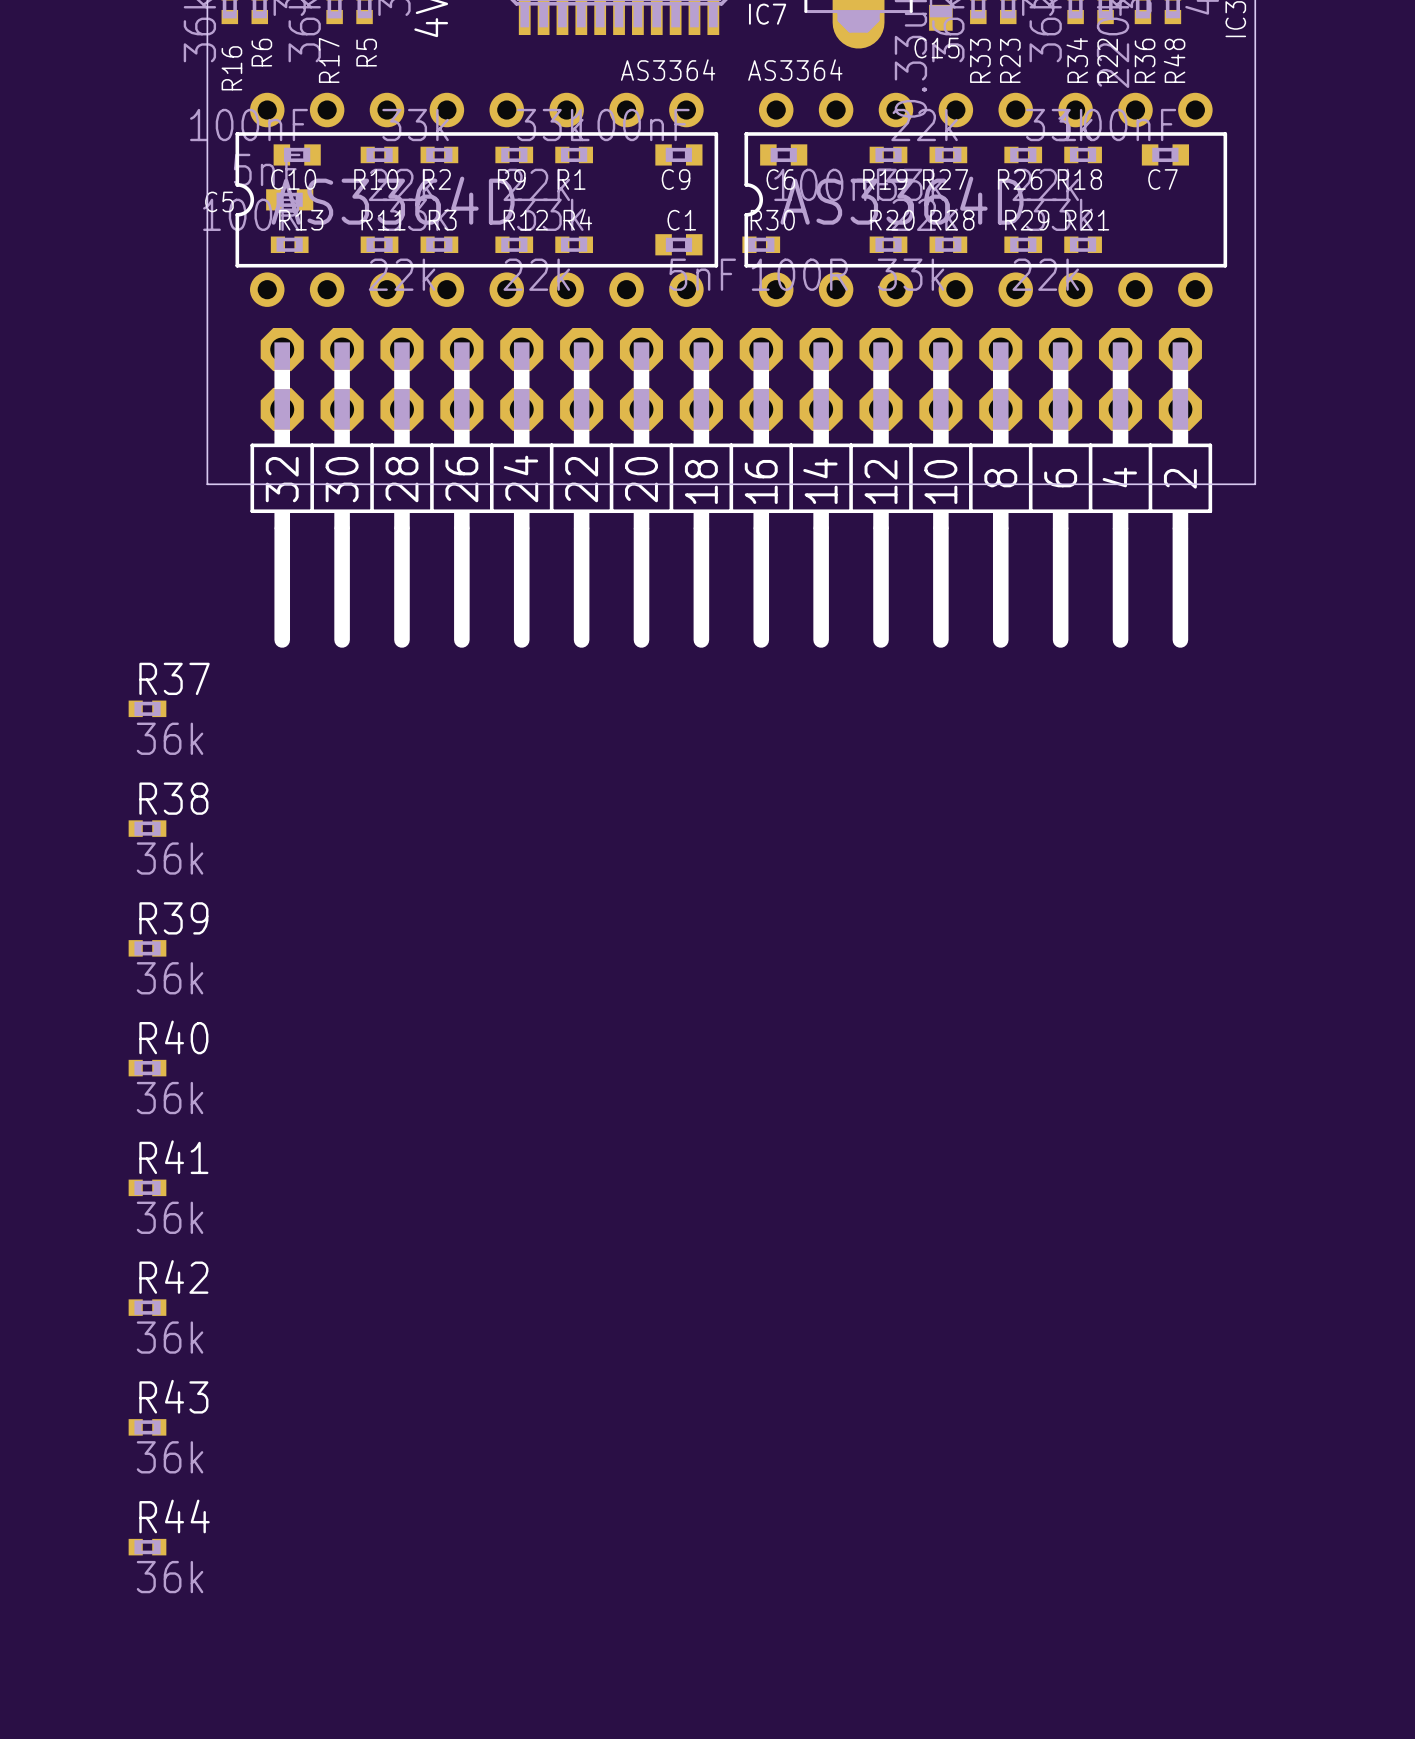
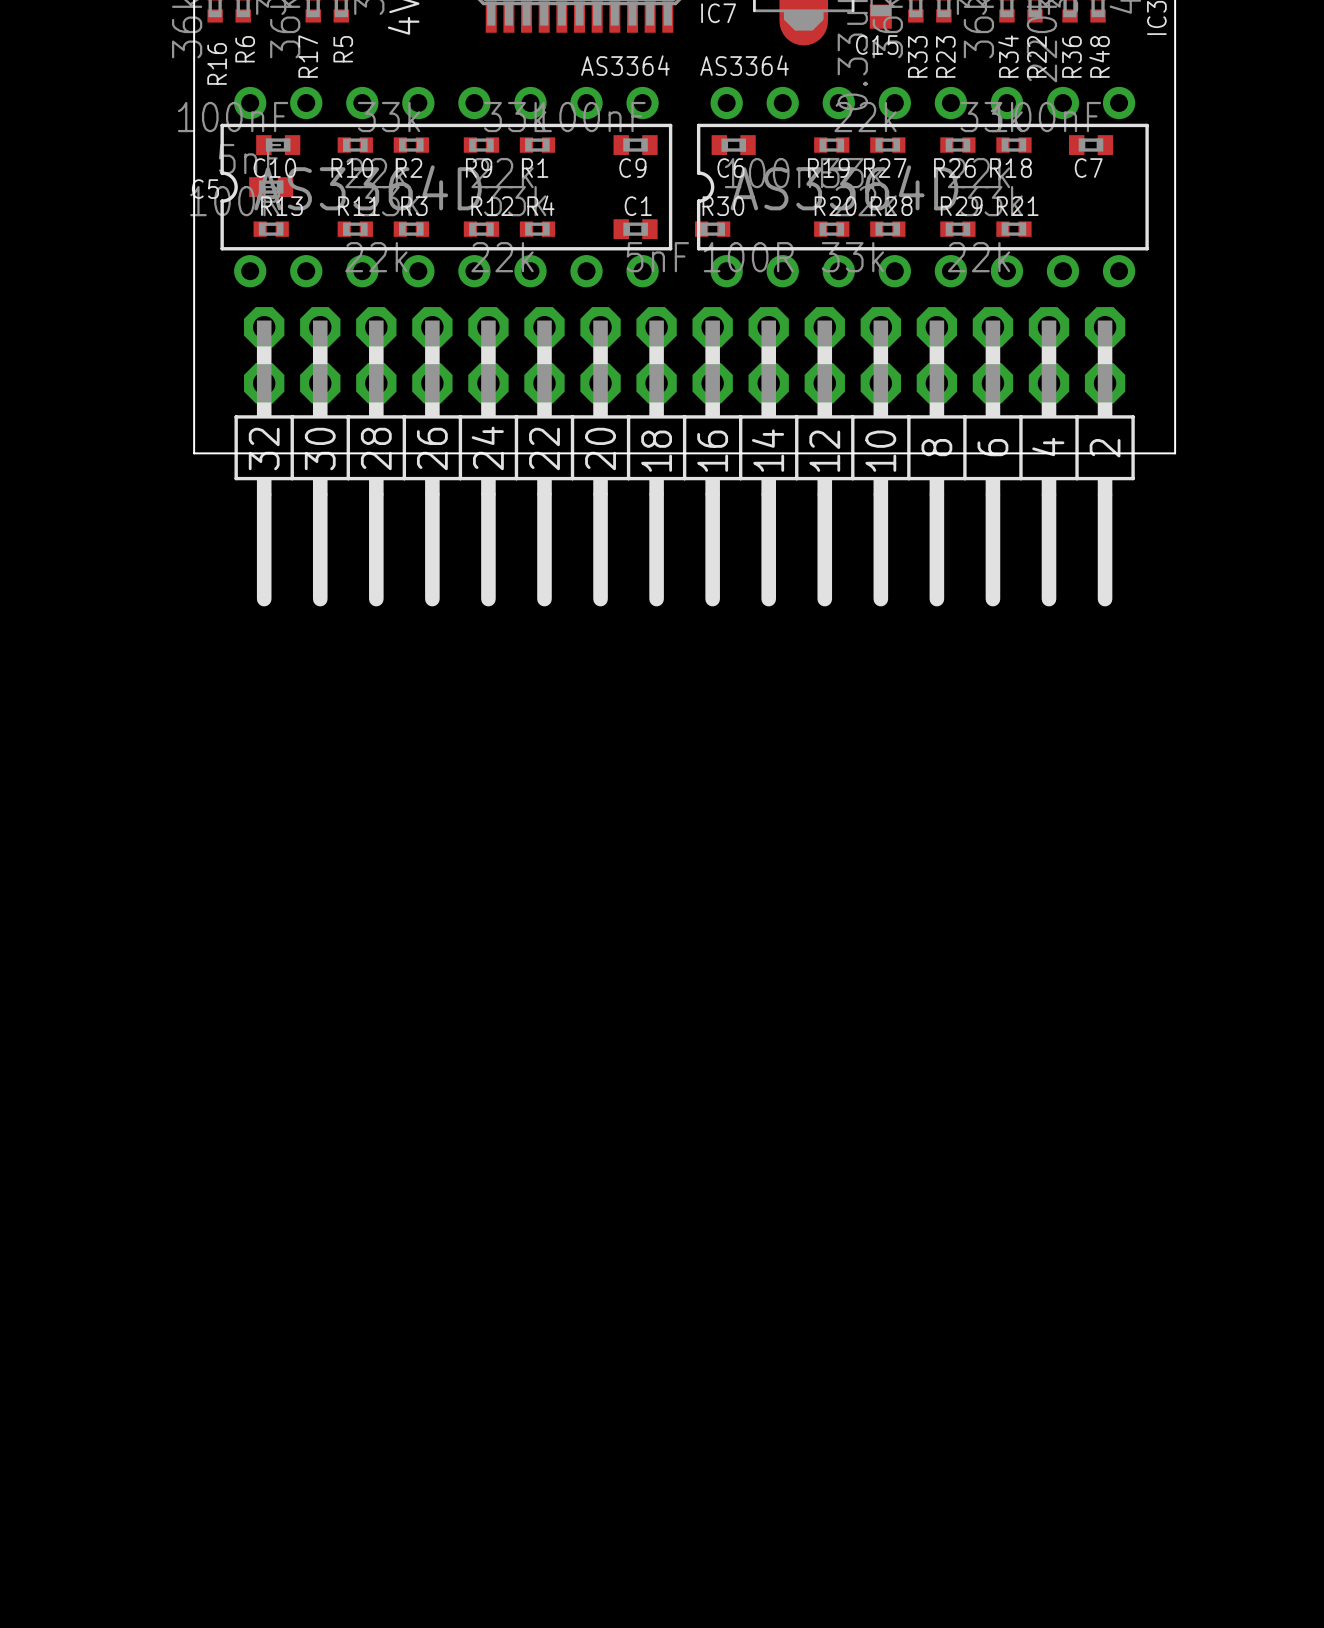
R37: 36k (147, 708) -> none
R38: 36k (147, 828) -> none
R39: 36k (147, 948) -> none
R40: 36k (147, 1068) -> none
R41: 36k (147, 1187) -> none
R42: 36k (147, 1307) -> none
R43: 36k (147, 1427) -> none
R44: 36k (147, 1547) -> none

